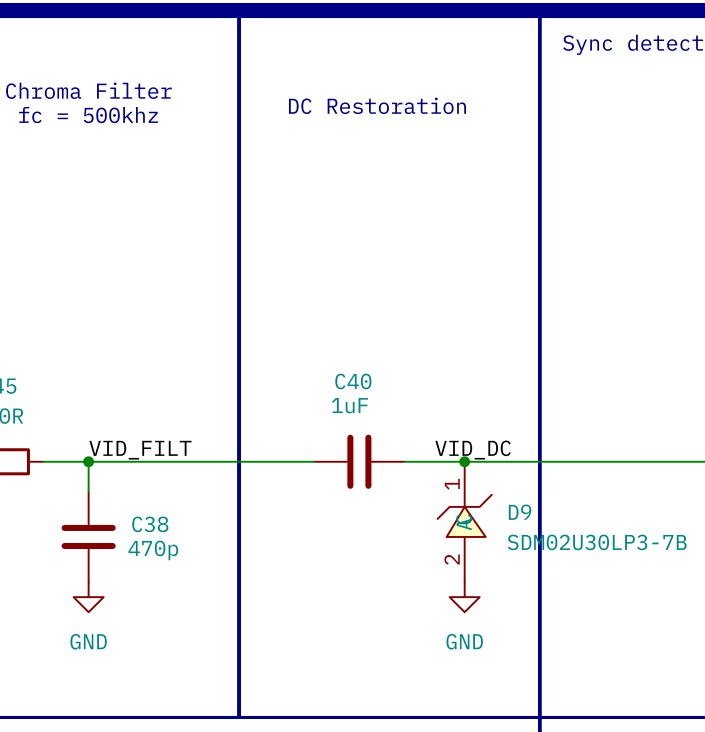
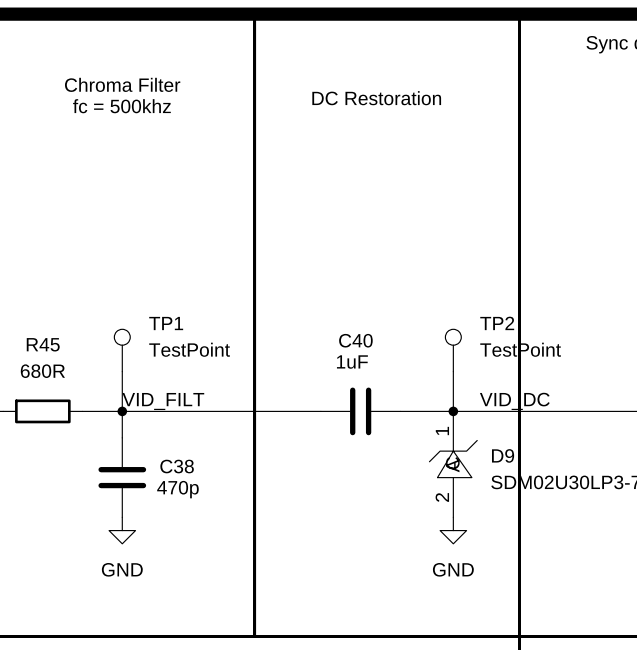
TP1: none -> TestPoint (122, 350)
TP2: none -> TestPoint (453, 350)
wire: none -> (122, 371) (122, 411)
wire: none -> (453, 371) (453, 411)
label position: VID_DC (473, 450) -> VID_DC (514, 401)

